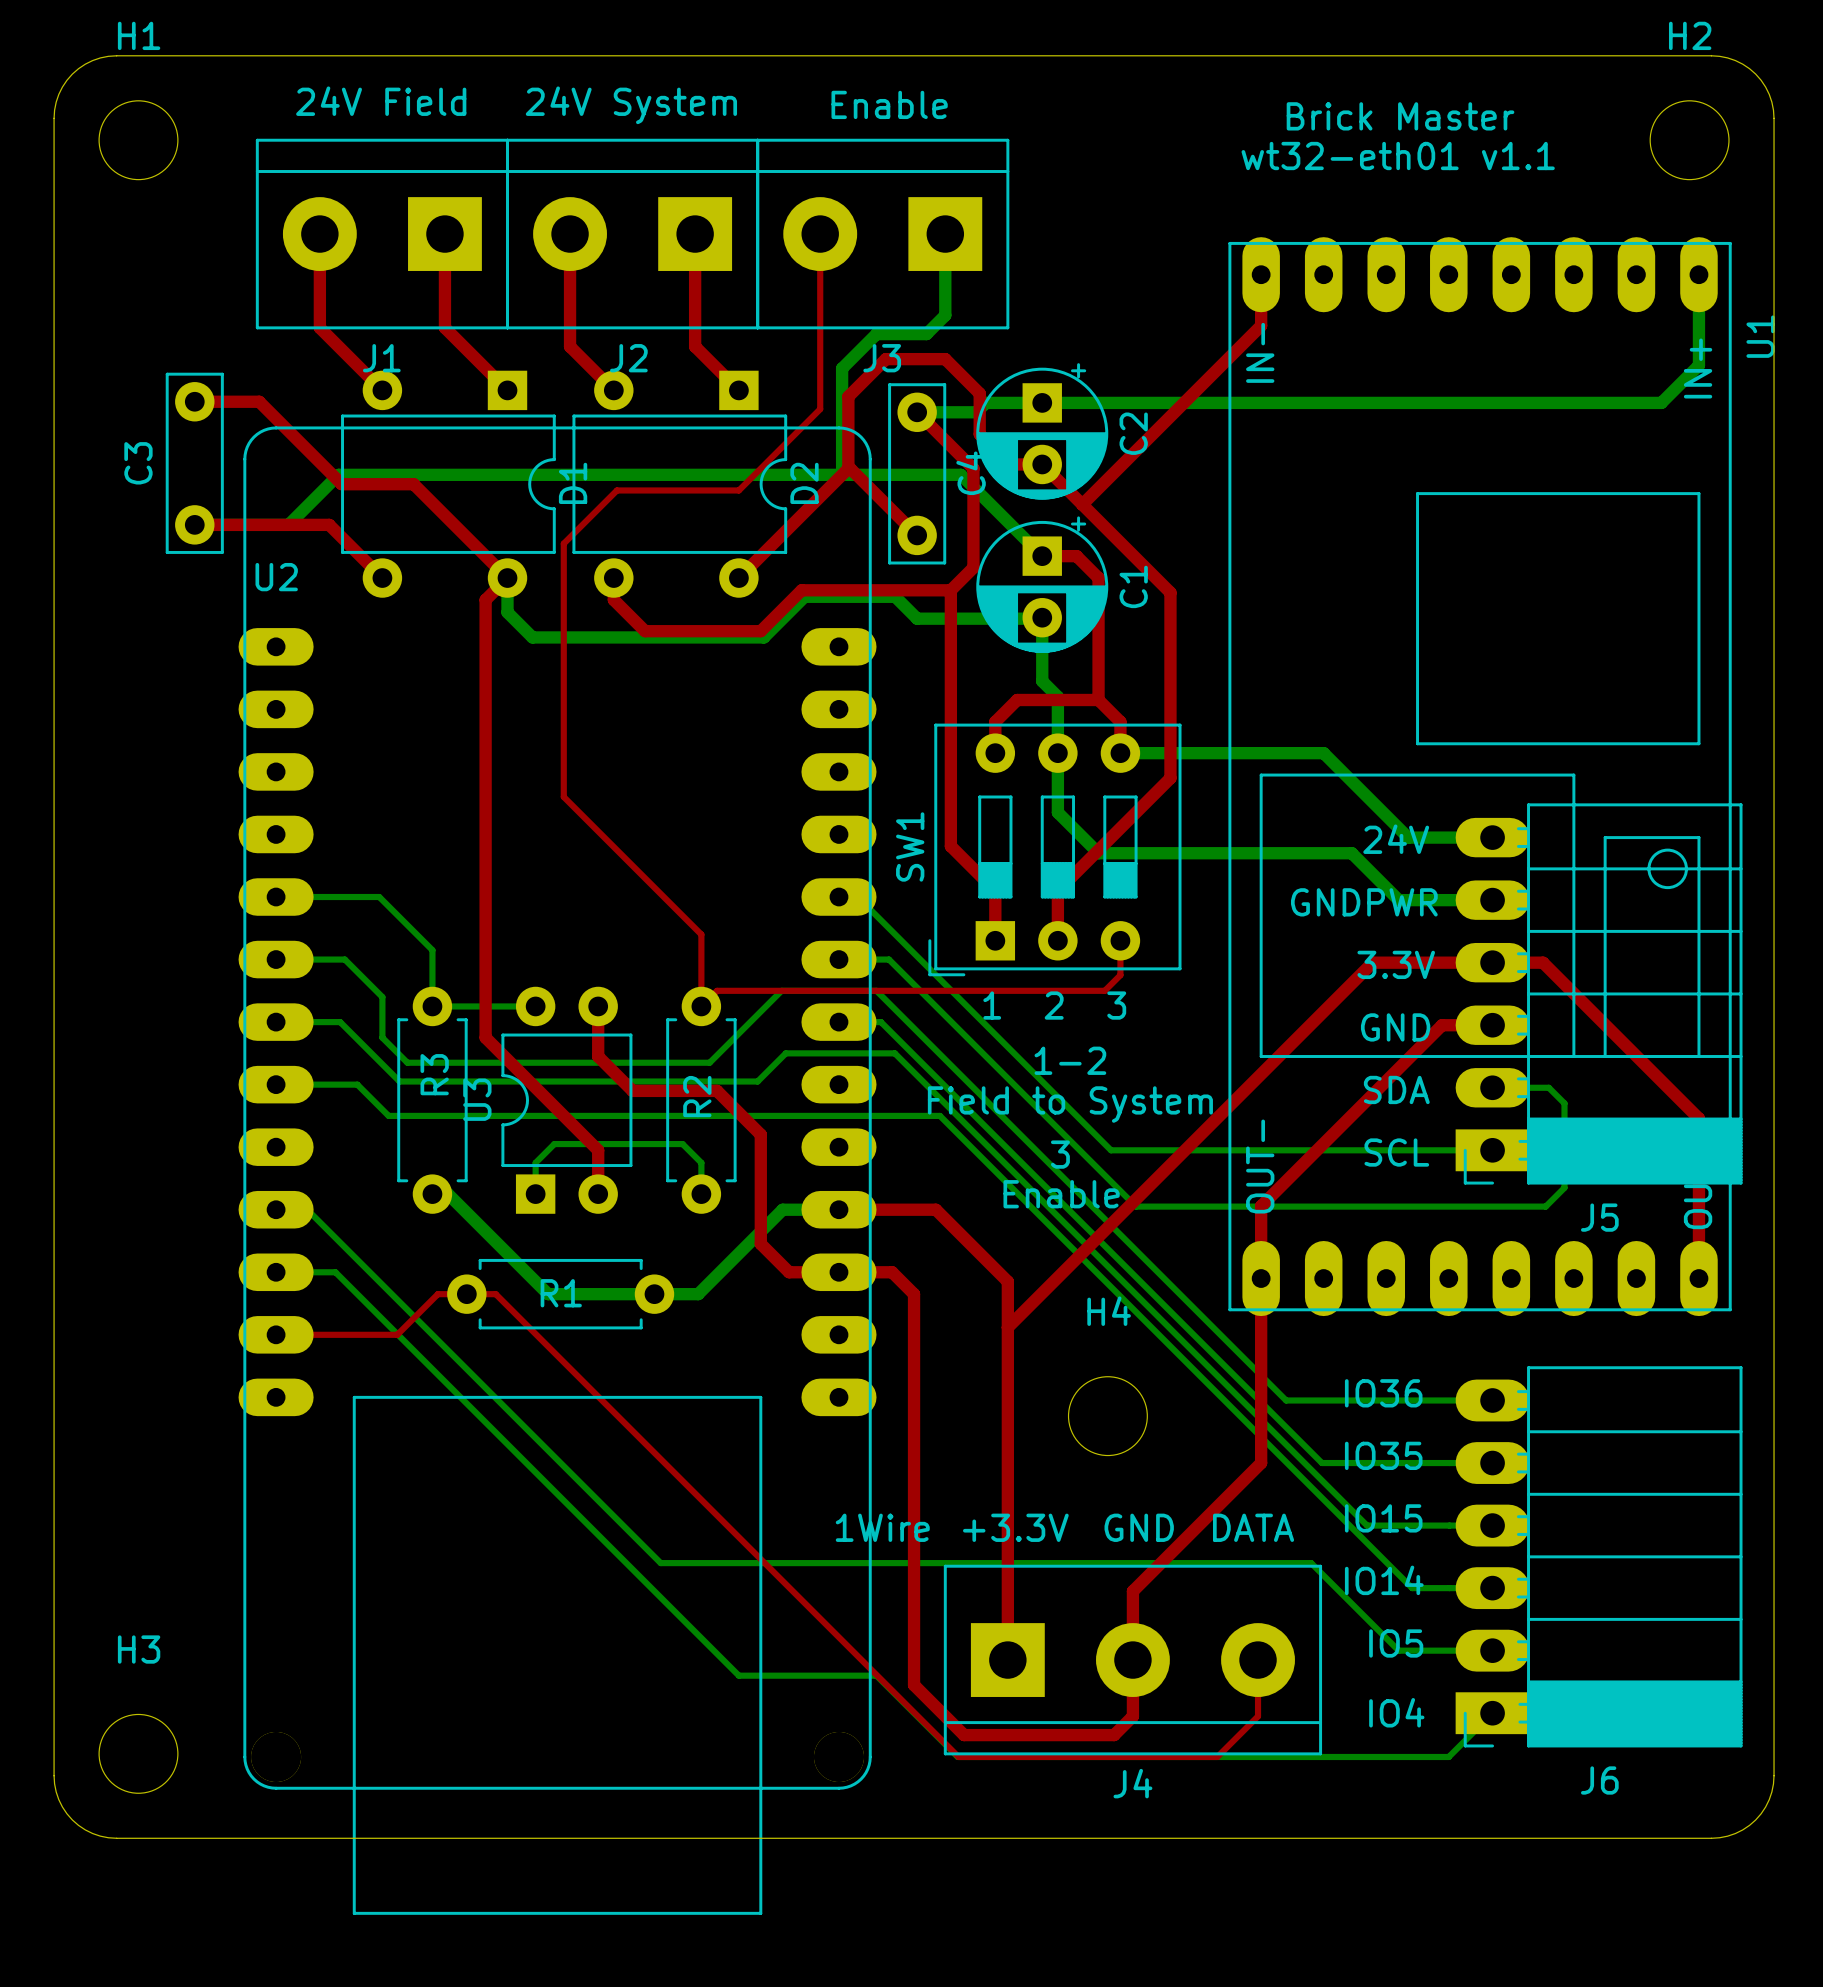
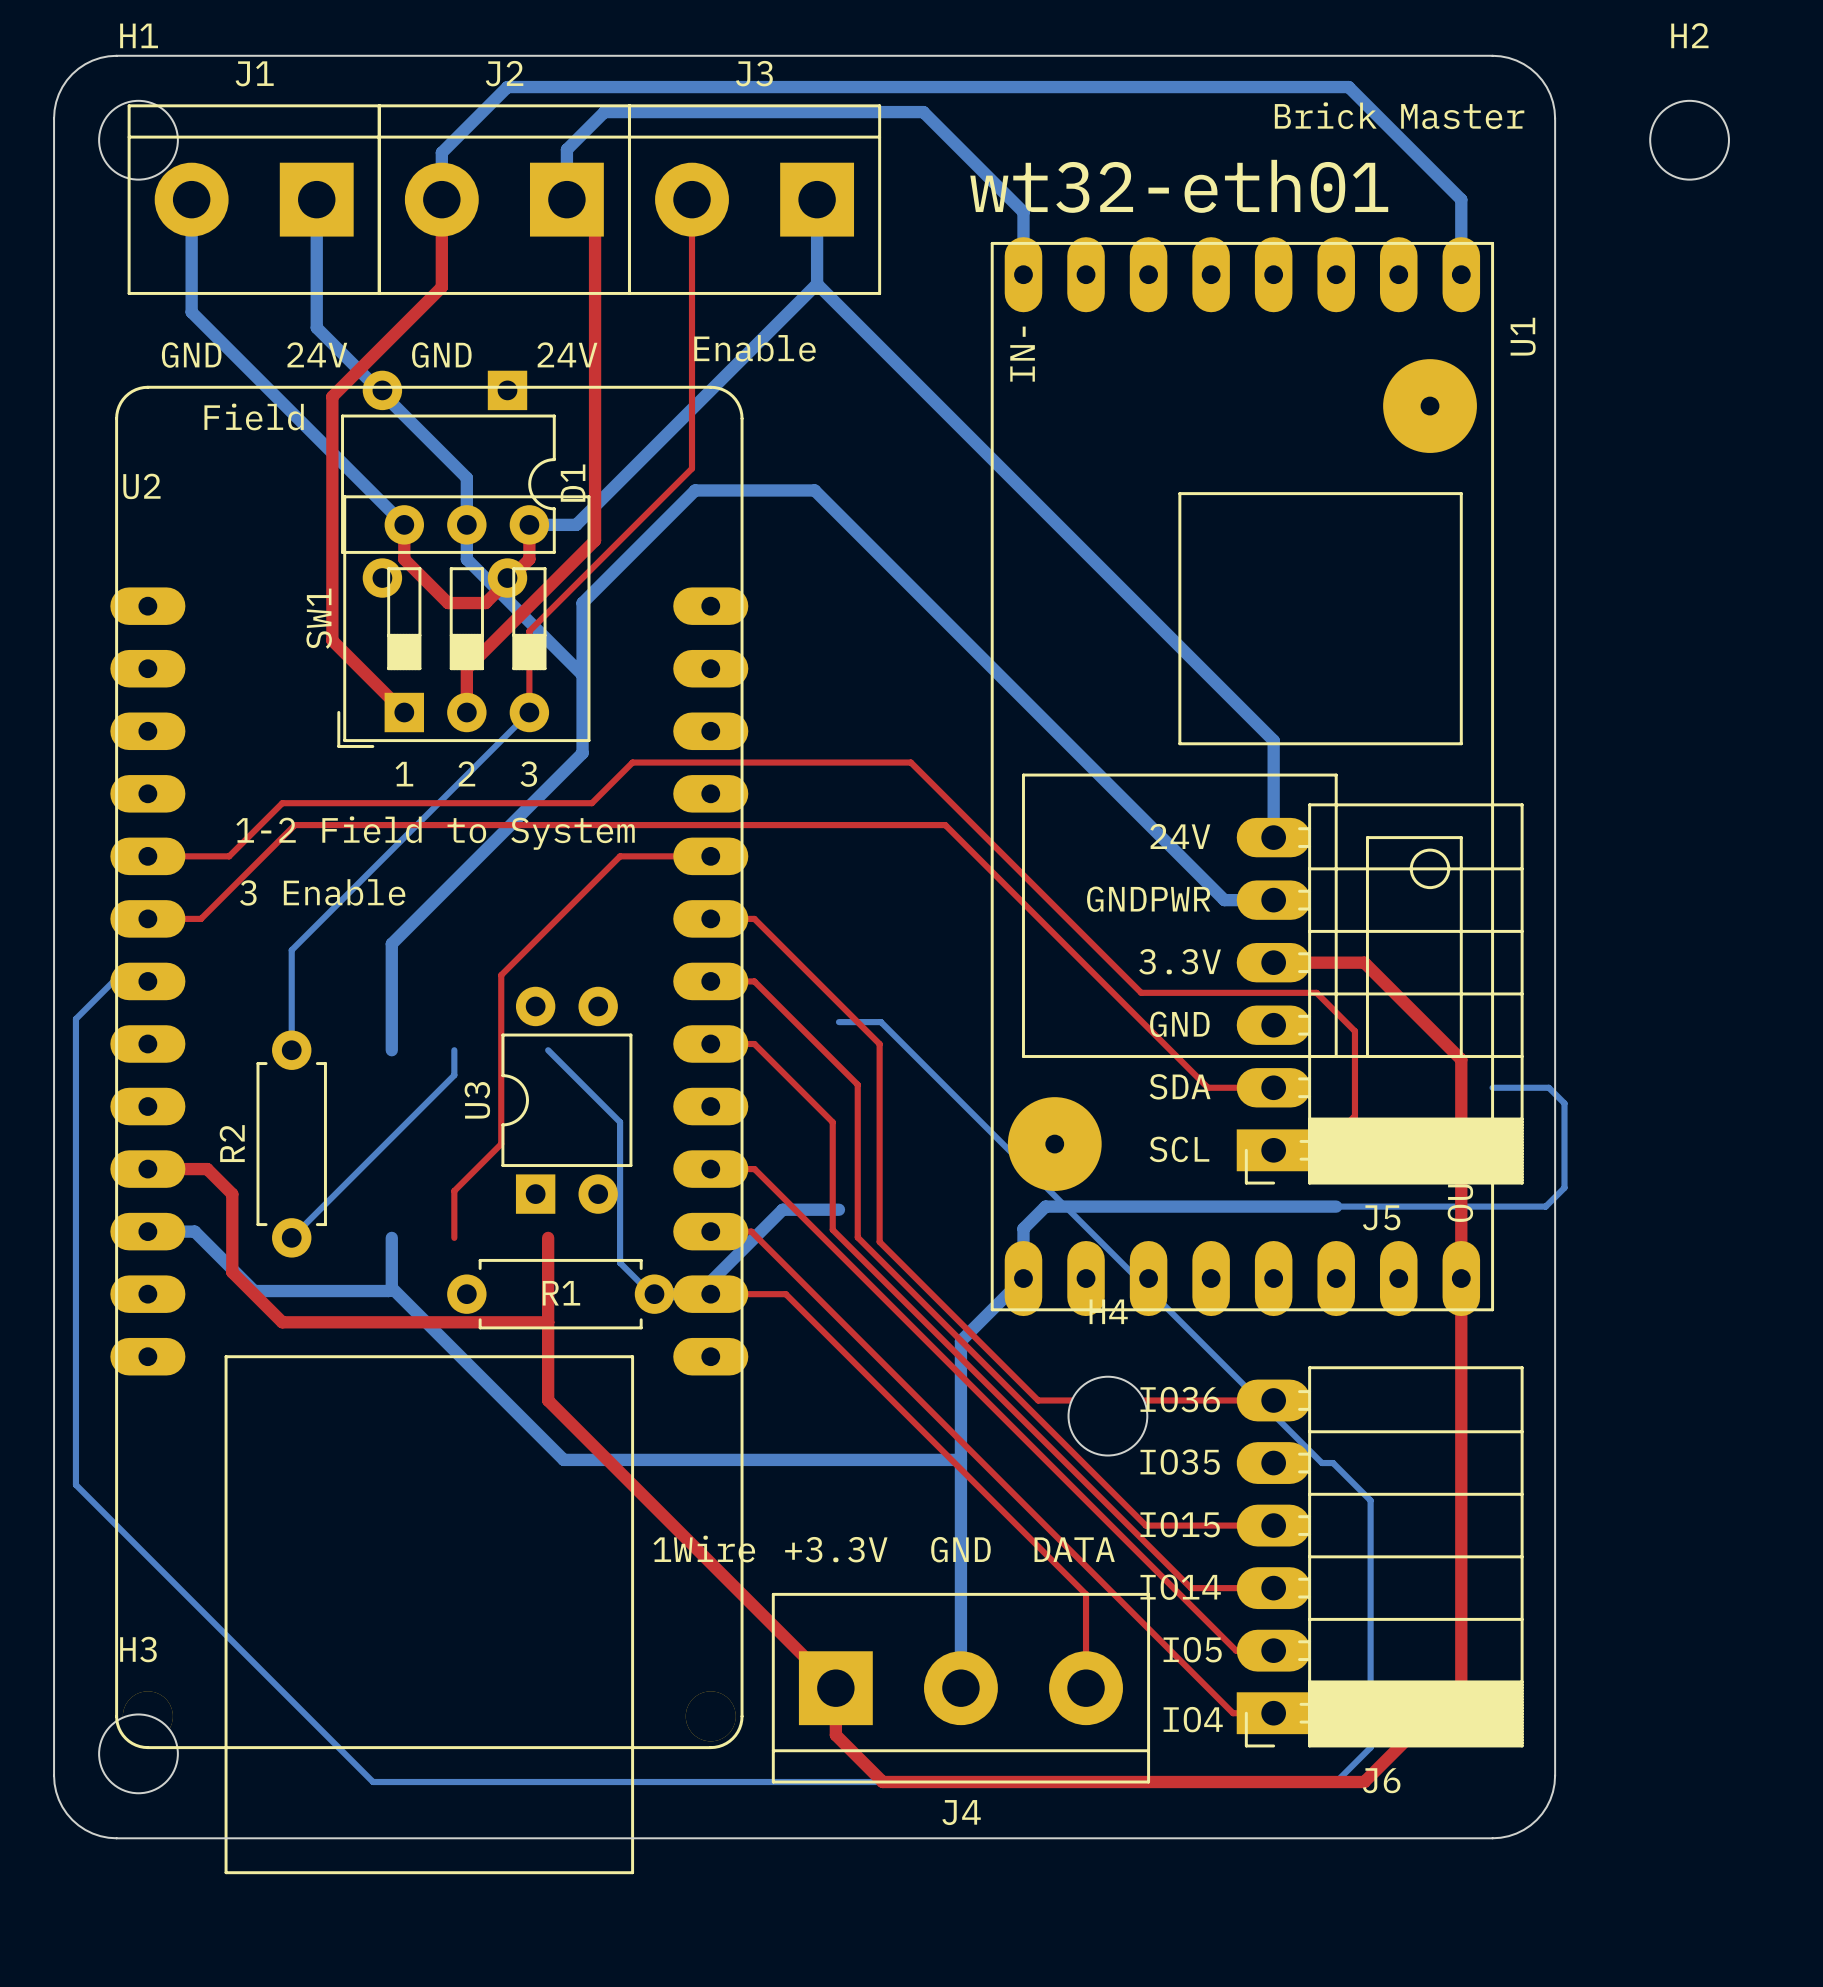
board edge: (1492, 55) (1711, 55) (1727, 57) (1742, 64) (1761, 80) (1771, 102) (1774, 118) (1773, 1783) (1769, 1799) (1755, 1819) (1742, 1829) (1719, 1837) (1492, 1838) -> (1492, 55) (1516, 60) (1536, 74) (1550, 94) (1555, 118) (1555, 1775) (1550, 1799) (1536, 1819) (1516, 1833) (1492, 1838)
text: 24V Field (381, 101) -> none
text position: Enable (889, 104) -> Enable (754, 348)
text: 24V System (631, 105) -> none
text: wt32-eth01 v1.1 (1398, 156) -> wt32-eth01 (1179, 186)
bottom track: none -> (191, 199) (191, 312) (404, 524)
bottom track: none -> (316, 199) (316, 327) (466, 477) (466, 559) (582, 674)
top track: none -> (441, 199) (441, 287) (332, 396) (332, 640) (404, 712)
bottom track: none -> (441, 199) (441, 152) (507, 87) (1348, 87) (1461, 199) (1461, 274)
top track: none -> (566, 199) (595, 227) (595, 540) (466, 668) (466, 712)
bottom track: none -> (566, 199) (566, 149) (604, 112) (923, 112) (1023, 212) (1023, 274)
top track: none -> (692, 199) (692, 468) (529, 631) (529, 712)
bottom track: none -> (817, 199) (817, 284)
top track: (319, 234) (319, 327) (382, 390) -> none
J1 position: (382, 234) -> (254, 199)
top track: (444, 234) (444, 327) (507, 390) -> none
top track: (570, 234) (570, 346) (613, 390) -> none
J2 position: (632, 234) -> (504, 199)
top track: (695, 234) (695, 346) (738, 390) -> none
top track: (820, 234) (820, 409) (738, 490) (616, 490) (563, 543) (563, 796) (701, 934) (701, 1006) (717, 990) (1104, 990) (1120, 975) (1120, 940) -> none
J3 position: (882, 234) -> (754, 199)
bottom track: (945, 234) (945, 315) (926, 334) (876, 334) (842, 368) (842, 474) -> none
U1 footprint: [1228, 237, 1732, 1317] -> [990, 237, 1495, 1317]
top track: (1261, 274) (1261, 325) (1082, 504) -> none
bottom track: (1698, 274) (1698, 365) (1661, 402) (985, 402) (976, 412) (917, 412) -> none
bottom track: none -> (817, 284) (1273, 740) (1273, 837)
bottom track: none -> (817, 284) (576, 524) (529, 524)
text: none -> 24V (317, 354)
text: none -> 24V (567, 354)
text: none -> GND (191, 355)
text: none -> GND (441, 355)
J1 name position: J1 (381, 358) -> J1 (254, 73)
J2 name position: J2 (628, 358) -> J2 (504, 73)
J3 name position: J3 (882, 358) -> J3 (754, 73)
top track: (194, 401) (259, 401) (341, 484) (413, 484) (507, 578) (485, 599) (485, 1037) (598, 1150) (598, 1194) -> none
top track: (917, 412) (973, 468) (973, 567) (950, 590) -> none
text: none -> Field (254, 416)
C2: (1042, 431) -> none
C3: (194, 463) -> none
top track: (848, 468) (738, 578) -> none
top track: (848, 468) (848, 396) (885, 359) (945, 359) (979, 393) (979, 434) (1009, 464) (1042, 464) (1082, 504) -> none
top track: (848, 468) (917, 535) -> none
C4: (917, 473) -> none
D2: (679, 484) -> none
top track: (1082, 504) (1170, 592) (1170, 778) (1057, 890) (1057, 940) -> none
top track: (194, 524) (329, 524) (382, 578) -> none
bottom track: (194, 524) (288, 524) (338, 474) (960, 474) (1042, 556) -> none
top track: none -> (404, 524) (404, 559) (448, 603) (485, 603) (529, 559) (529, 524)
top track: (1042, 556) (1076, 556) (1098, 578) (1098, 699) -> none
U2 name position: U2 (276, 577) -> U2 (141, 486)
bottom track: (507, 578) (507, 612) (532, 637) (763, 637) (804, 596) (895, 596) (917, 618) (1042, 617) (1042, 681) (1057, 696) (1057, 812) (1098, 853) (1351, 853) (1398, 900) (1492, 900) -> none
top track: (613, 578) (613, 599) (645, 631) (760, 631) (801, 590) (950, 590) -> none
C1: (1042, 584) -> none
top track: (950, 590) (950, 846) (995, 890) (995, 940) -> none
top track: (1098, 699) (1120, 721) (1120, 753) -> none
top track: (1098, 699) (1017, 699) (995, 721) (995, 753) -> none
bottom track: none -> (529, 712) (291, 950) (291, 1050)
bottom track: (1120, 753) (1323, 753) (1408, 837) (1492, 837) -> none
text: none -> 1 (404, 774)
text: none -> 2 (466, 773)
text: none -> 3 (528, 774)
text: none -> 1-2 Field to System (435, 833)
text position: 24V (1396, 839) -> 24V (1180, 836)
SW1 position: (1054, 849) -> (463, 621)
top track: none -> (147, 856) (229, 856) (282, 803) (591, 803) (632, 762) (910, 762) (1141, 992) (1316, 992) (1354, 1031) (1354, 1115) (1320, 1150) (1273, 1150)
top track: none -> (710, 856) (620, 856) (501, 975) (501, 1144) (454, 1190) (454, 1237)
text: none -> 3 Enable (322, 892)
bottom track: (276, 897) (379, 897) (432, 950) (432, 1006) (535, 1006) -> none
bottom track: (838, 897) (857, 897) (1111, 1150) (1492, 1150) -> none
bottom track: none -> (1273, 900) (1224, 900) (814, 490) (695, 490) (582, 603) (582, 753) (391, 943) (391, 1050)
text position: GNDPWR (1364, 902) -> GNDPWR (1148, 899)
top track: none -> (147, 918) (201, 918) (294, 825) (945, 825) (1207, 1087) (1273, 1087)
top track: none -> (710, 918) (754, 918) (879, 1044) (879, 1241) (1038, 1400) (1273, 1400)
bottom track: (276, 959) (344, 959) (382, 997) (382, 1037) (407, 1062) (709, 1062) (781, 990) (876, 990) (1286, 1400) (1492, 1400) -> none
bottom track: (838, 959) (889, 959) (1136, 1206) -> (960, 1688) (960, 1341) (1023, 1278) (1023, 1228) (1045, 1206) (1136, 1206)
top track: none -> (1273, 962) (1364, 962) (1461, 1059) (1461, 1685) (1364, 1782) (882, 1782) (835, 1735) (835, 1688) (548, 1400) (548, 1237)
text position: 3.3V (1396, 964) -> 3.3V (1180, 961)
top track: none -> (710, 981) (754, 981) (857, 1084) (857, 1237) (1145, 1525) (1273, 1525)
J5 position: (1599, 993) -> (1380, 993)
text: 1 (992, 1005) -> none
text: 2 (1054, 1005) -> none
text: 3 (1116, 1005) -> none
top track: (598, 1006) (598, 1056) (632, 1090) (717, 1090) (760, 1134) (760, 1243) (789, 1272) (892, 1272) (914, 1294) (914, 1685) (964, 1735) (1114, 1735) (1132, 1716) (1132, 1591) (1261, 1463) (1261, 1206) (1442, 1025) (1492, 1025) -> none
bottom track: (276, 1022) (340, 1022) (399, 1081) (757, 1081) (785, 1053) (894, 1053) (1367, 1525) (1492, 1525) -> none
text position: GND (1395, 1027) -> GND (1179, 1024)
top track: none -> (710, 1043) (754, 1043) (832, 1122) (832, 1229) (1191, 1588) (1273, 1588)
bottom track: none -> (454, 1050) (454, 1075) (291, 1237)
text: 1-2 (1070, 1060) -> none
bottom track: (276, 1084) (357, 1084) (388, 1115) (939, 1115) (1412, 1588) (1492, 1588) -> none
text position: SDA (1396, 1089) -> SDA (1180, 1086)
R2 name position: R2 (697, 1096) -> R2 (232, 1143)
R3: (432, 1100) -> none
R2 position: (701, 1100) -> (291, 1144)
text: Field to System (1070, 1104) -> none
text position: SCL (1396, 1152) -> SCL (1179, 1149)
text: 3 (1060, 1154) -> none
top track: none -> (147, 1169) (207, 1169) (232, 1194) (232, 1272) (282, 1322) (548, 1322)
top track: none -> (710, 1169) (754, 1169) (1236, 1650) (1273, 1650)
U2 position: (557, 1170) -> (429, 1129)
bottom track: (432, 1194) (448, 1194) (548, 1294) (651, 1294) -> (548, 1050) (620, 1122) (620, 1262) (651, 1294)
bottom track: (535, 1194) (535, 1162) (554, 1144) (682, 1144) (701, 1162) (701, 1194) -> none
text: Enable (1061, 1194) -> none
bottom track width: thin (1136, 1206) (1336, 1206) -> thick (1136, 1206) (1336, 1206)
bottom track: (276, 1209) (307, 1209) (660, 1563) (1311, 1563) (1398, 1650) (1492, 1650) -> none
top track: (838, 1209) (935, 1209) (1007, 1281) (1007, 1660) -> none
bottom track: none -> (147, 1231) (194, 1231) (254, 1291) (388, 1291) (391, 1287)
top track: none -> (710, 1231) (751, 1231) (1233, 1713) (1273, 1713)
bottom track: none -> (391, 1237) (391, 1287)
bottom track: (276, 1272) (335, 1272) (738, 1675) (876, 1675) (957, 1756) (1448, 1756) (1492, 1713) -> none
top track: (1698, 1278) (1698, 1118) (1543, 962) (1372, 962) (1007, 1327) -> none
bottom track: none -> (391, 1287) (563, 1459) (960, 1459)
top track: none -> (710, 1294) (785, 1294) (1086, 1594) (1086, 1688)
top track: (276, 1334) (397, 1334) (437, 1294) (495, 1294) (958, 1756) (1217, 1756) (1258, 1716) (1258, 1660) -> none
text position: IO36 (1383, 1393) -> IO36 (1180, 1399)
text position: IO35 (1383, 1455) -> IO35 (1180, 1462)
bottom track: (1333, 1463) (1492, 1463) -> (1333, 1463) (1370, 1500) (1370, 1747) (1336, 1782) (373, 1782) (75, 1484) (75, 1018) (113, 981) (147, 981)
text position: IO15 (1383, 1518) -> IO15 (1180, 1524)
text position: 1Wire (882, 1527) -> 1Wire (704, 1549)
text position: +3.3V (1015, 1527) -> +3.3V (836, 1549)
text position: GND (1139, 1527) -> GND (960, 1549)
text position: DATA (1253, 1527) -> DATA (1074, 1549)
J6 position: (1599, 1556) -> (1380, 1556)
text position: IO14 (1384, 1580) -> IO14 (1180, 1587)
text position: IO5 (1396, 1643) -> IO5 (1192, 1649)
J4 position: (1132, 1660) -> (960, 1688)
text position: IO4 (1396, 1712) -> IO4 (1193, 1719)

